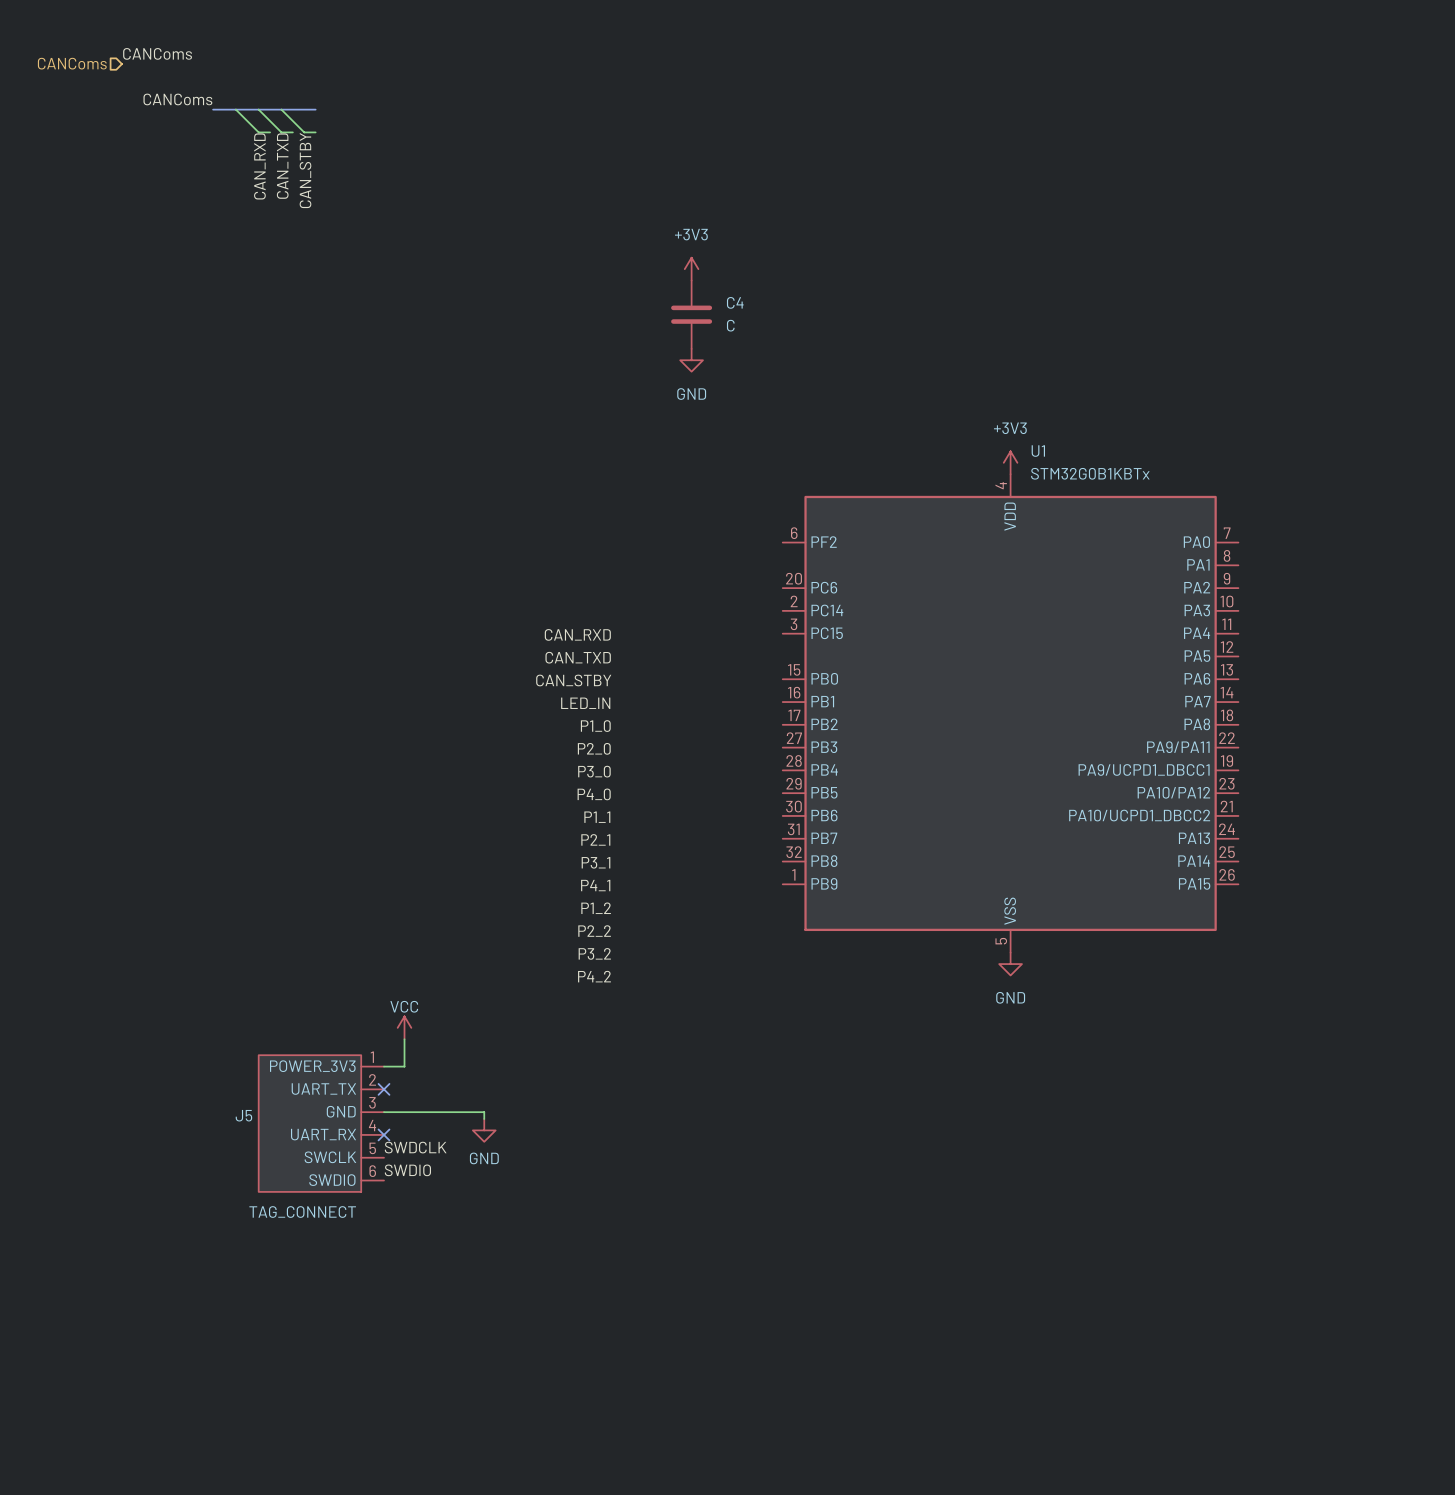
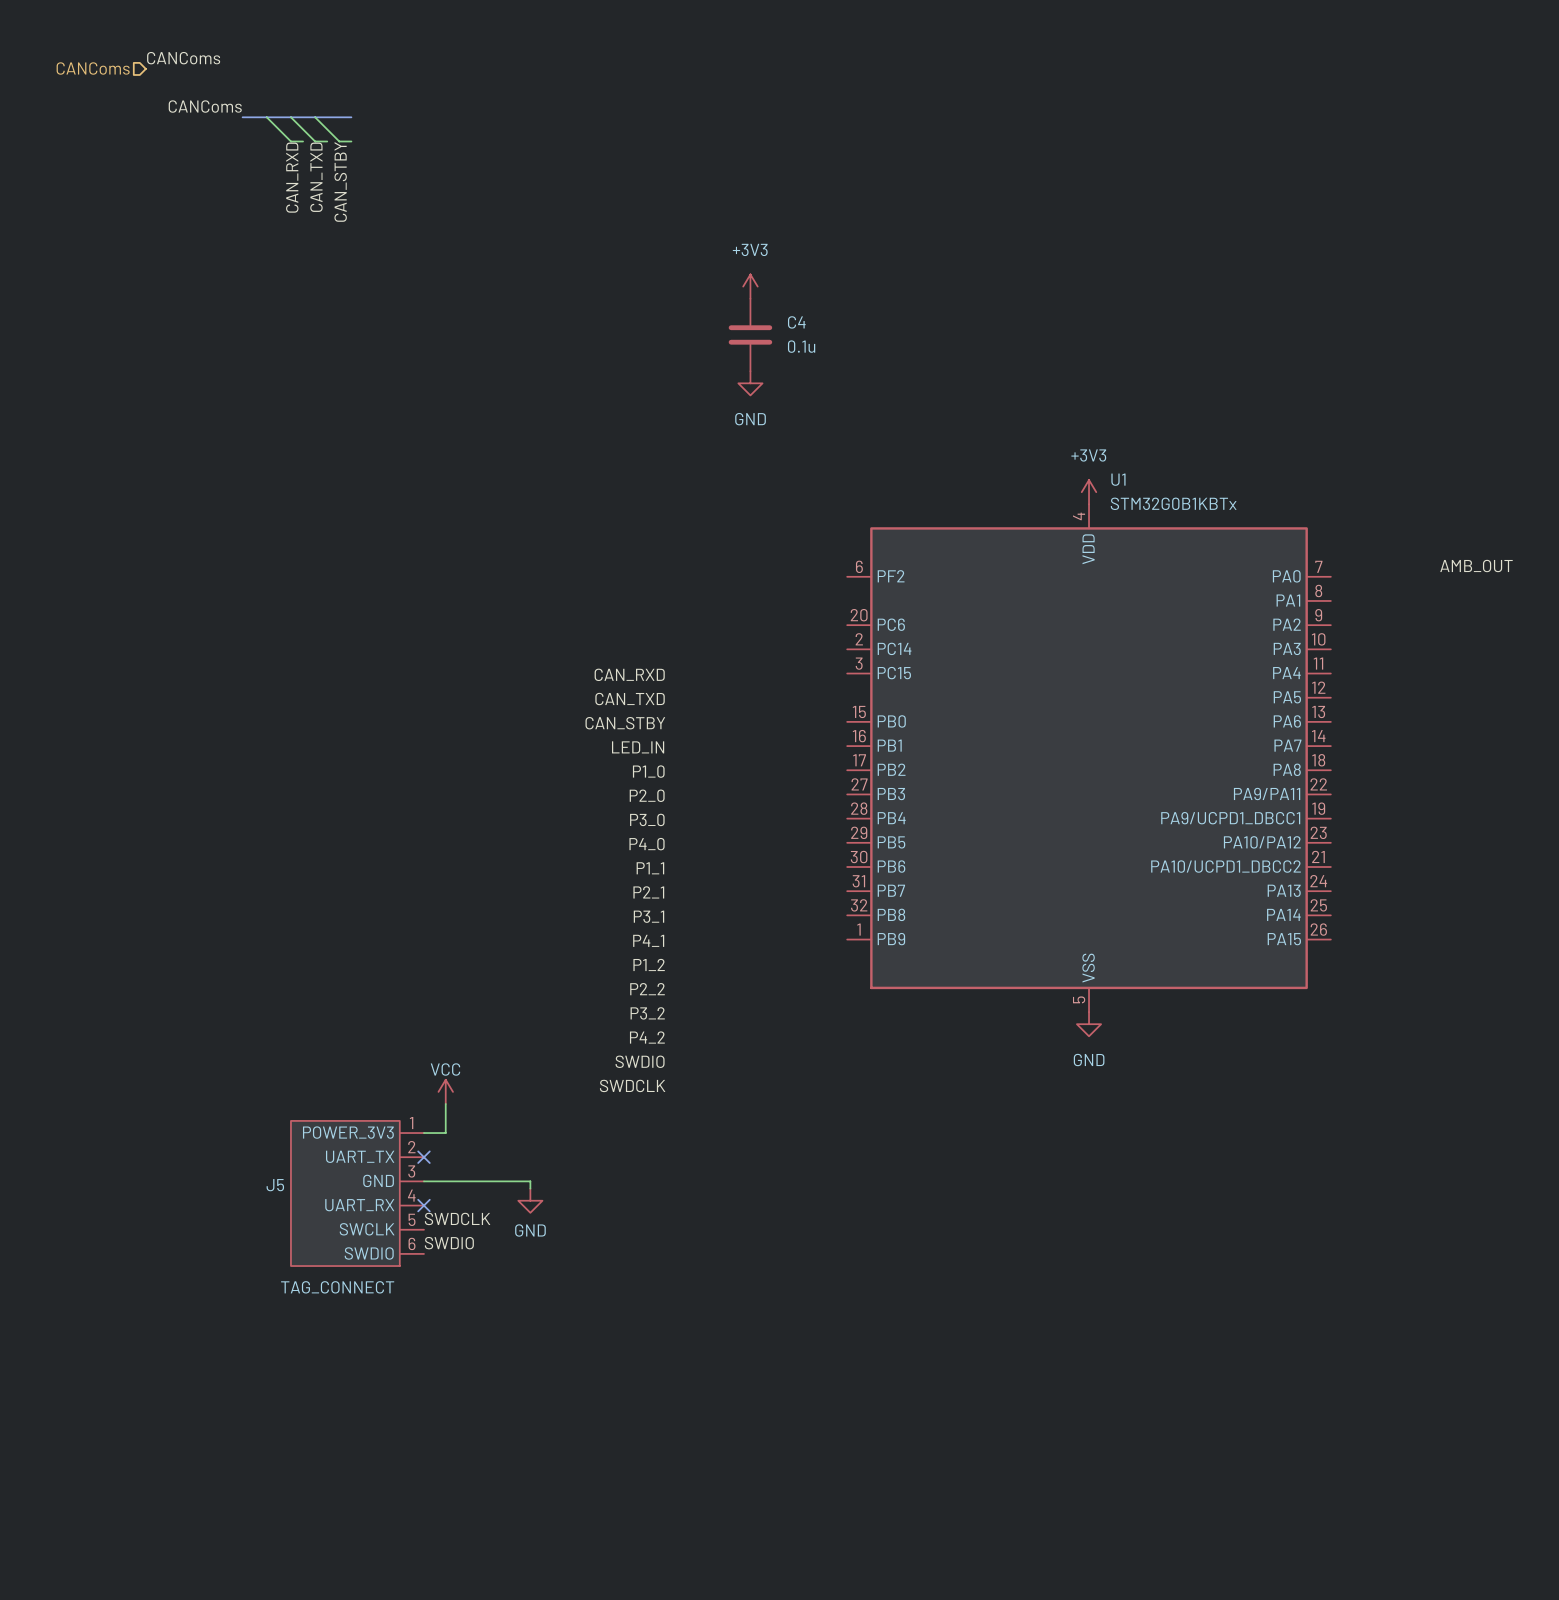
C4 value: C (730, 325) -> 0.1u (801, 346)
label: none -> AMB_OUT (1476, 566)
label: none -> SWDIO (640, 1061)
label: none -> SWDCLK (632, 1085)

